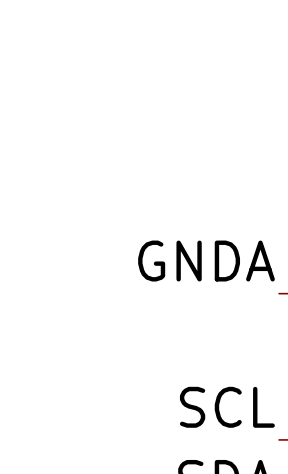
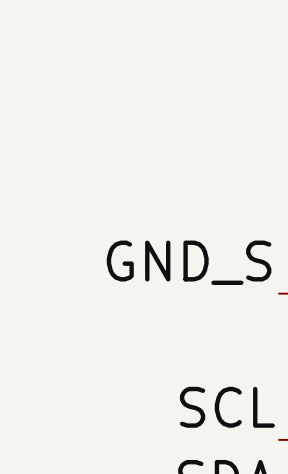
label: GNDA (206, 261) -> GND_S (189, 262)

